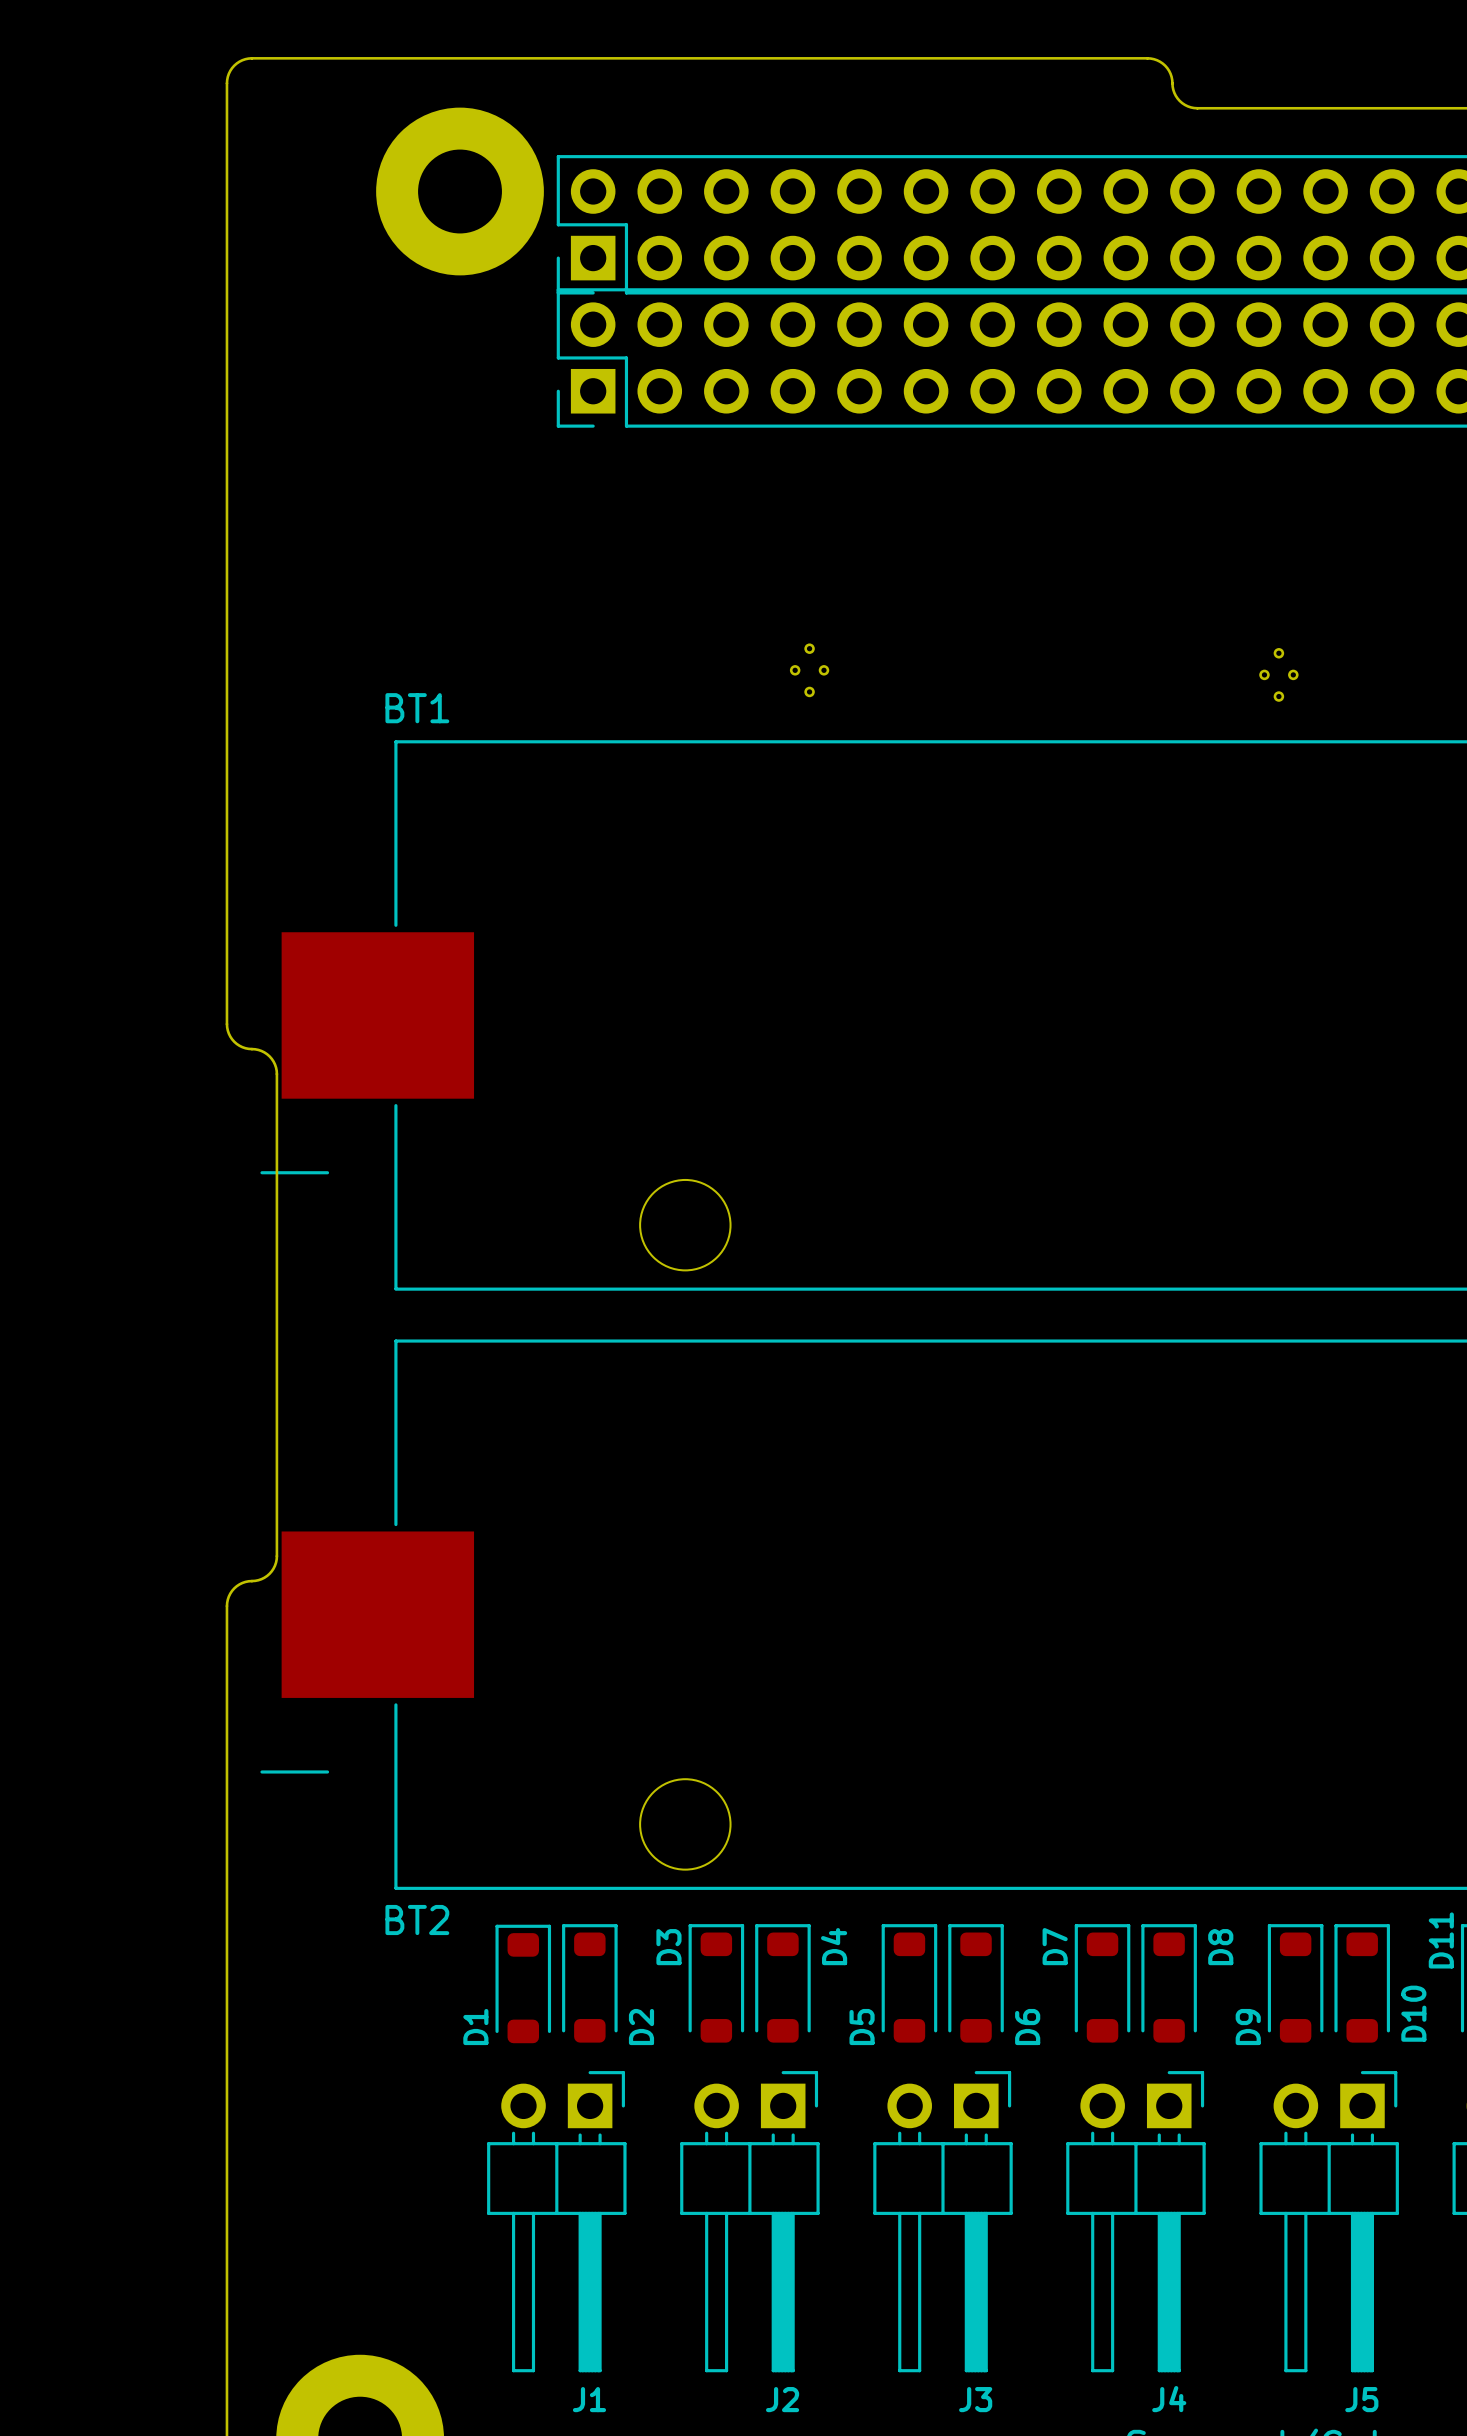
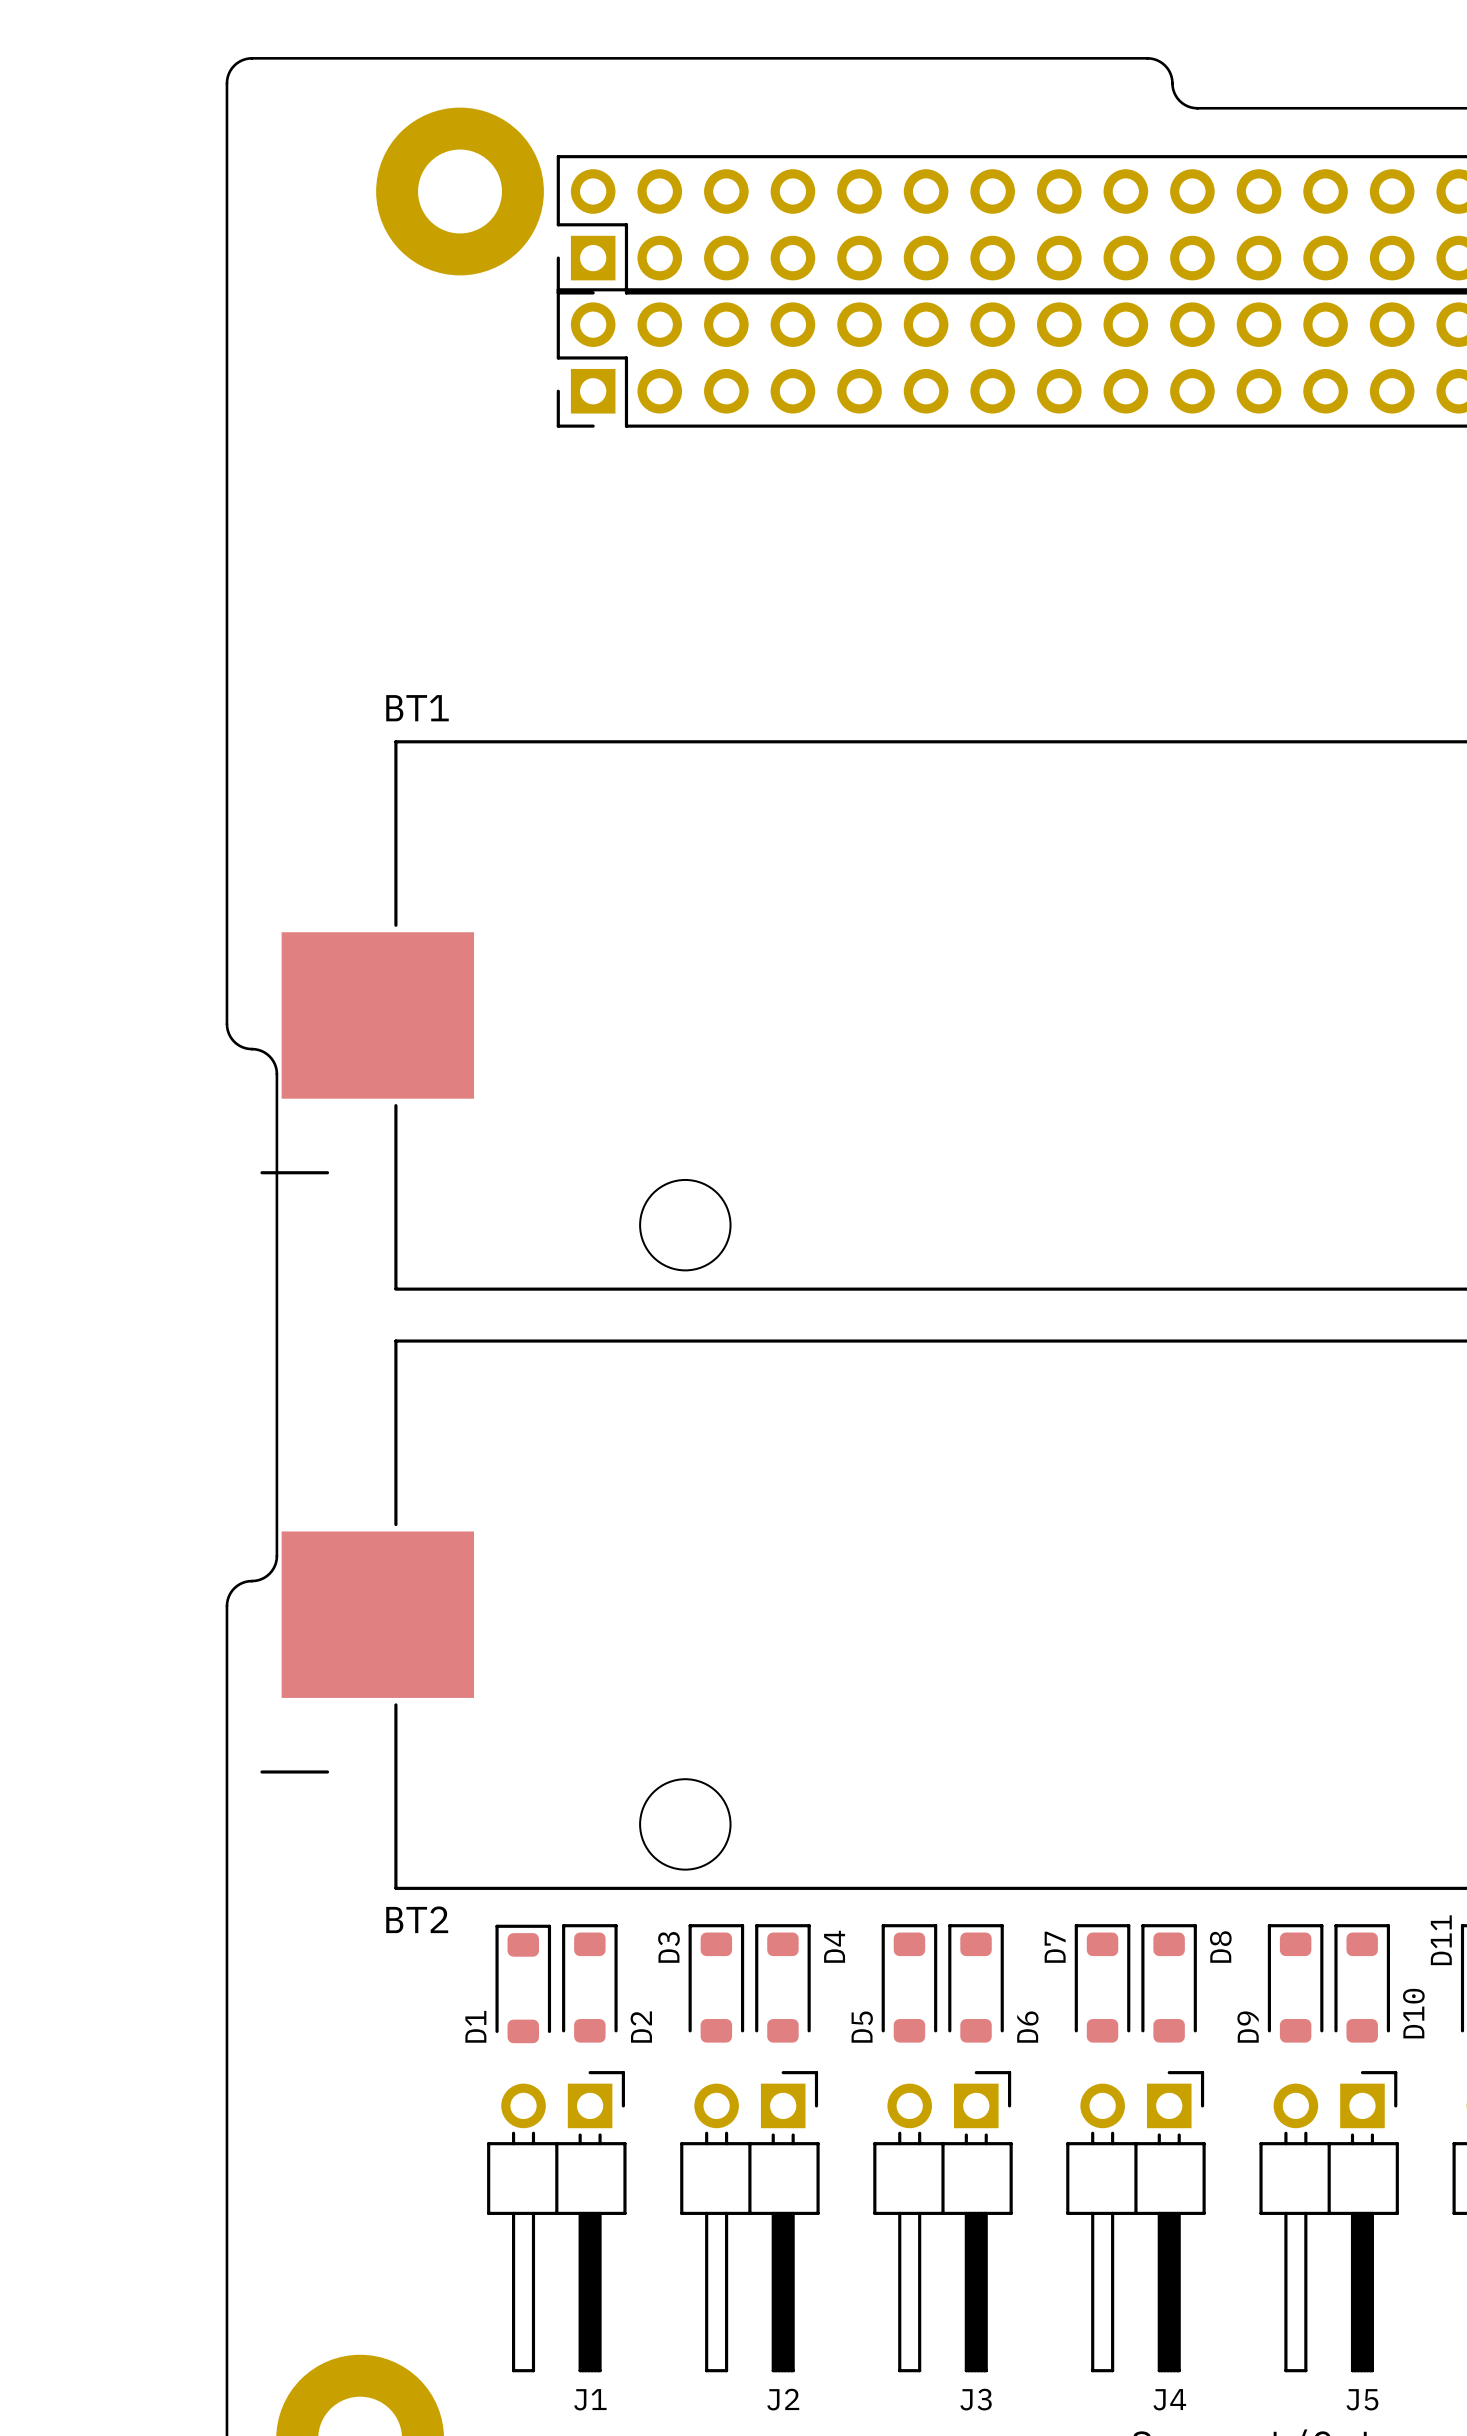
part: (809, 670) -> none
part: (1278, 674) -> none

